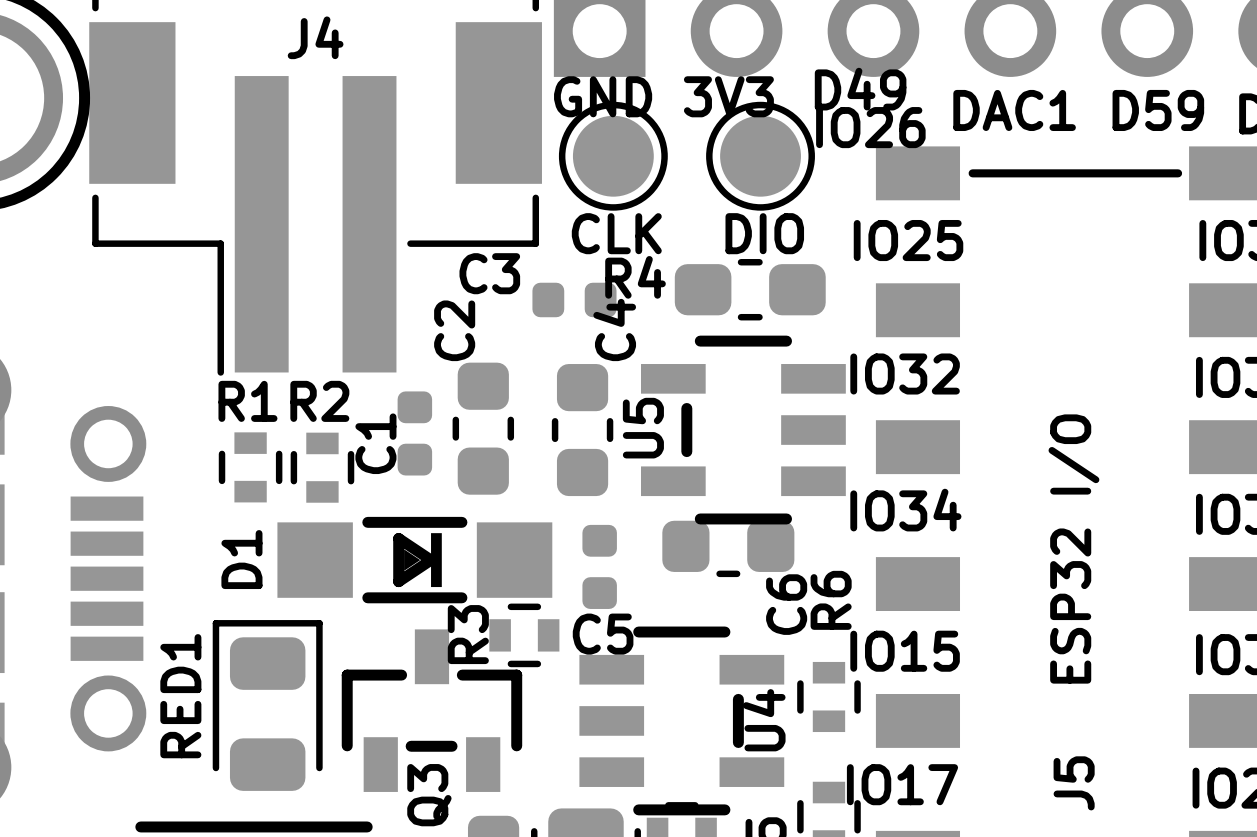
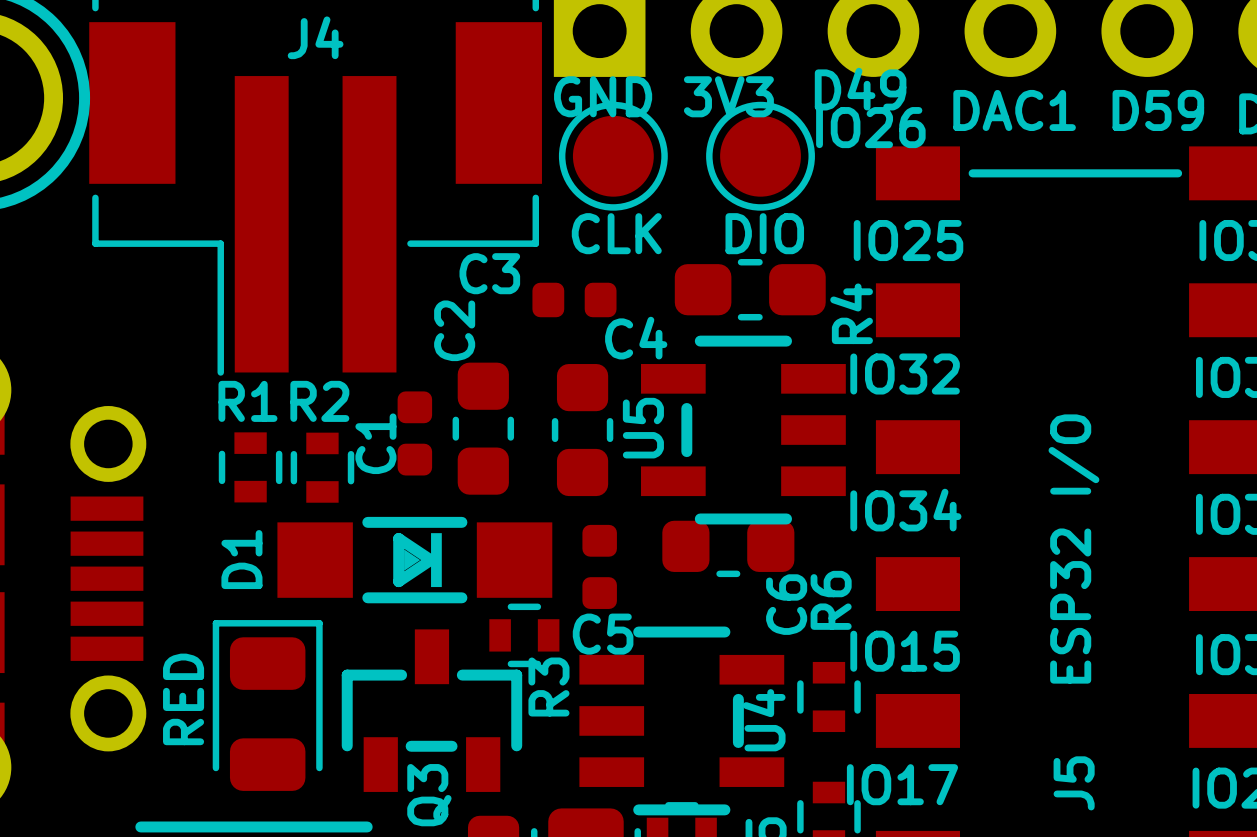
R4 name rotation: 0° (635, 277) -> 90° counterclockwise (851, 313)
R4 name position: R4 (635, 277) -> R4 (851, 313)
C4 name rotation: 0° (614, 329) -> 90° clockwise (636, 338)
R3 name position: R3 (468, 634) -> R3 (548, 687)
RED1 name: RED1 (180, 696) -> none
text: none -> RED (183, 699)

